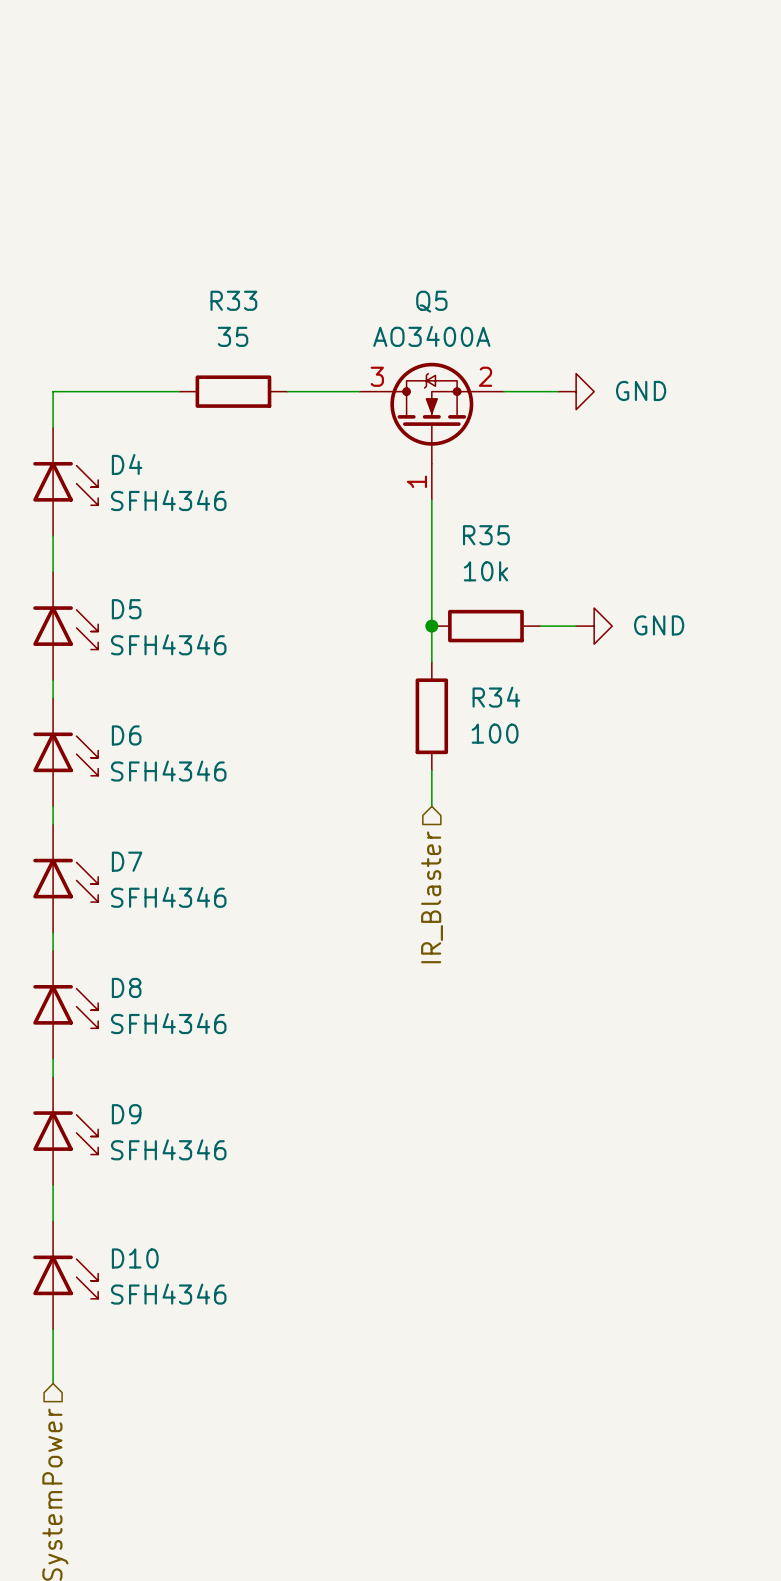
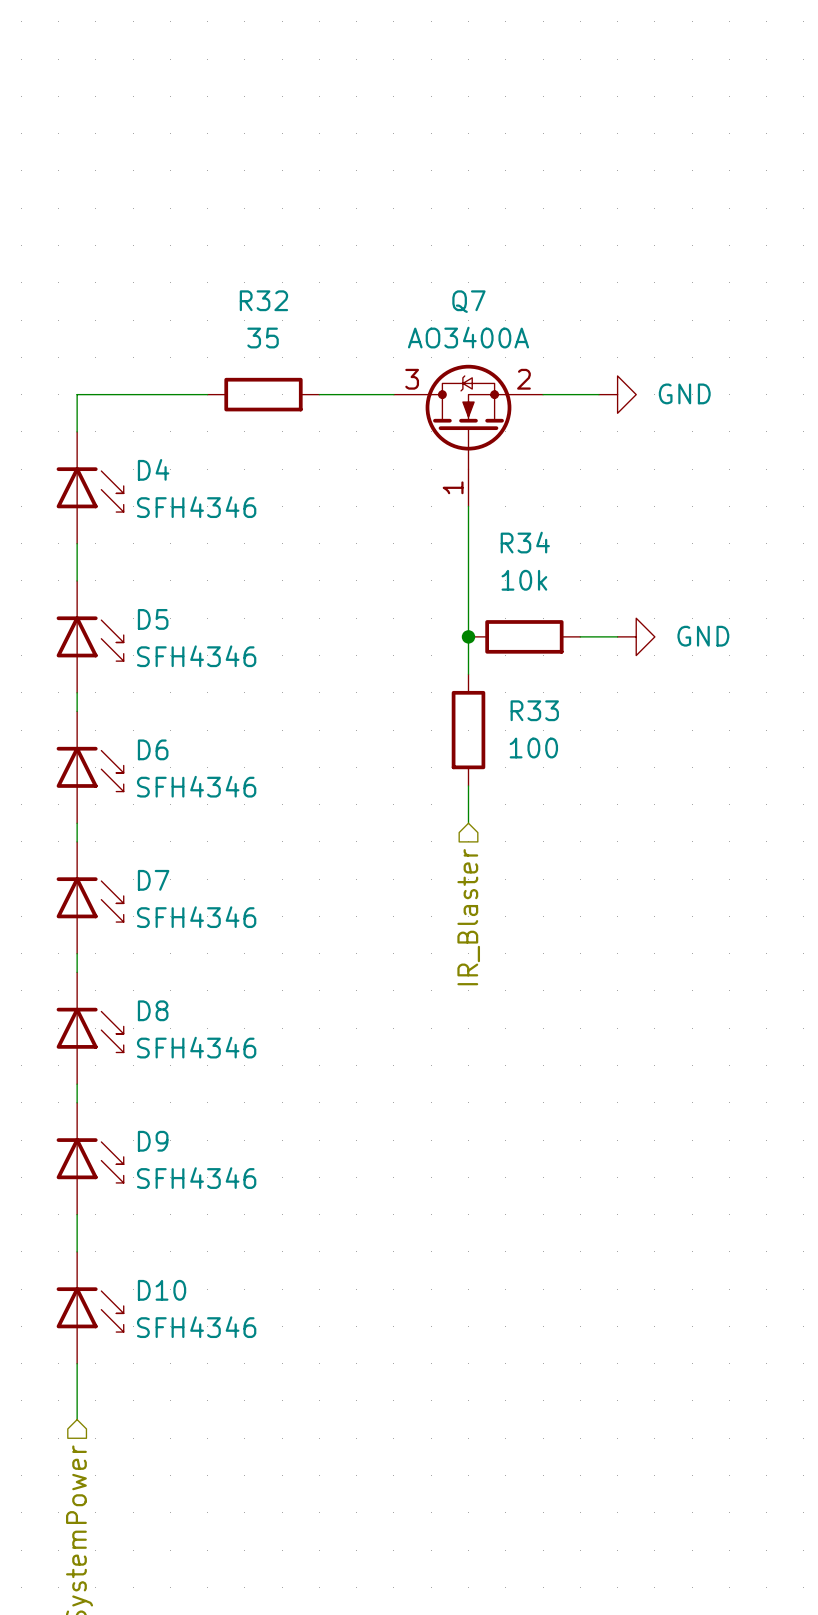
R33 name: R33 (233, 300) -> R32 (263, 300)
Q5 name: Q5 (431, 301) -> Q7 (468, 301)
R35 name: R35 (486, 535) -> R34 (525, 542)
R34 name: R34 (496, 697) -> R33 (534, 710)

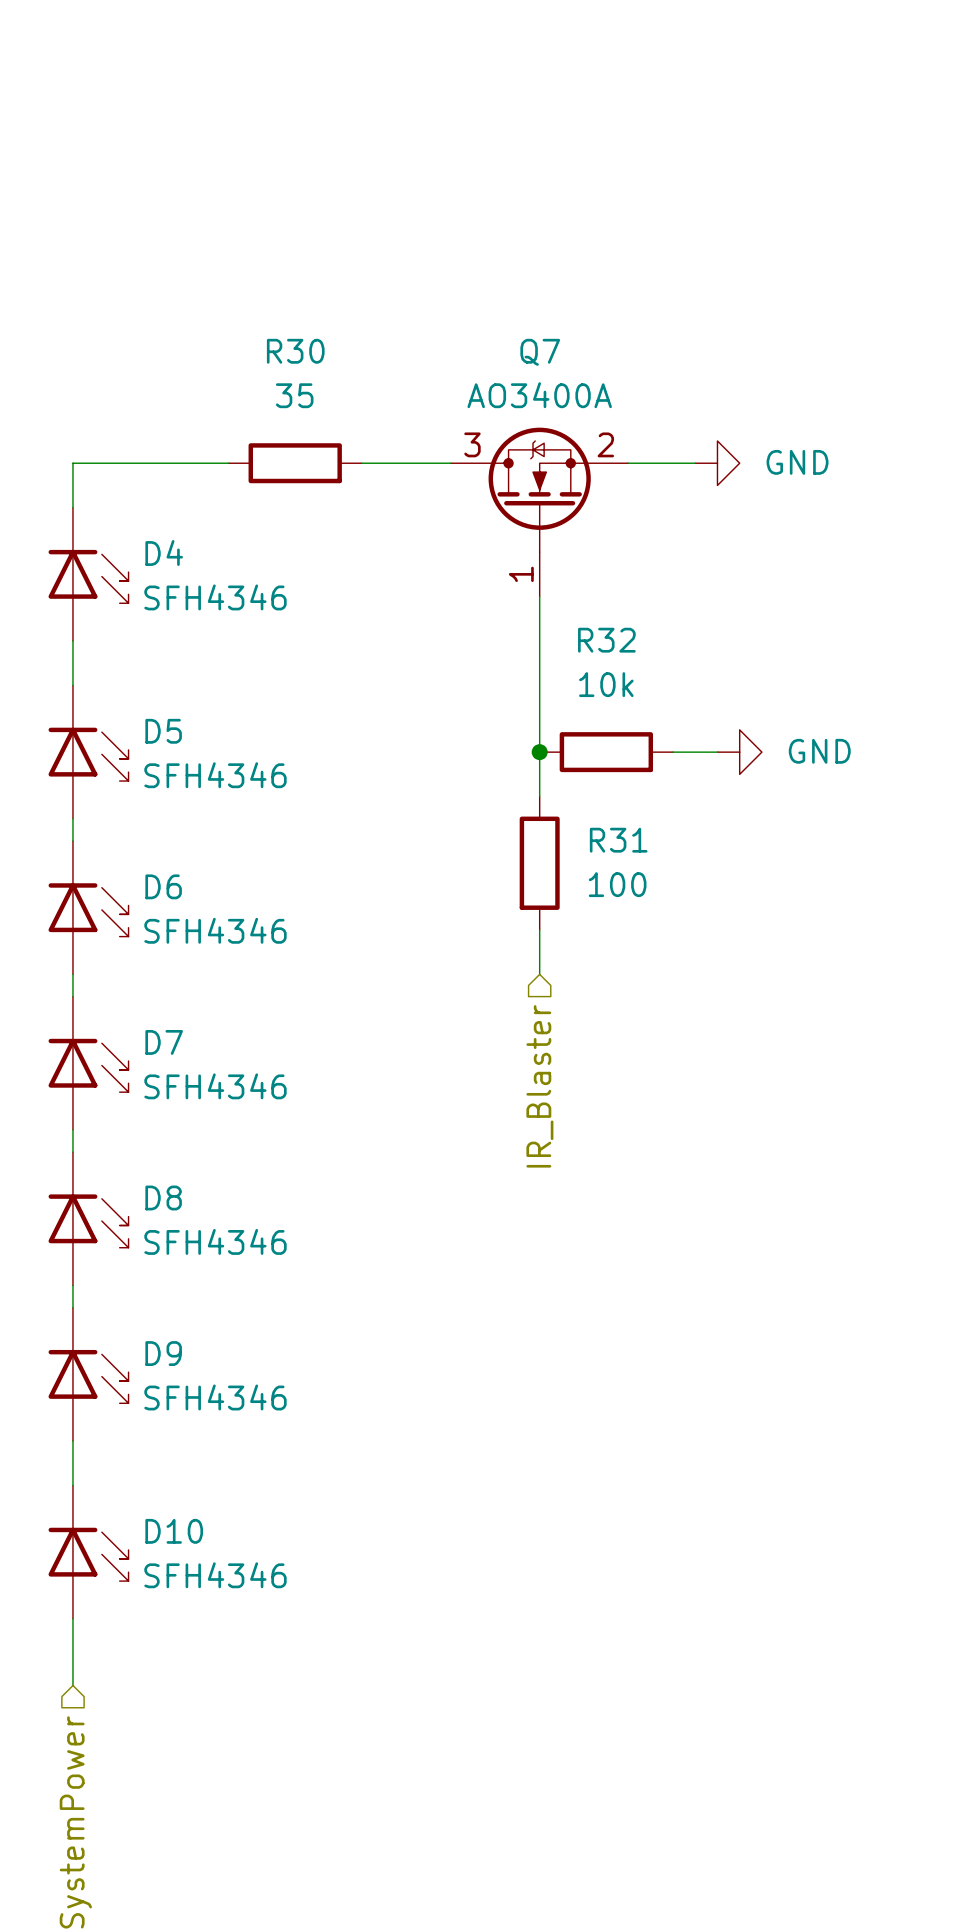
R32 name: R32 (263, 300) -> R30 (295, 351)
R34 name: R34 (525, 542) -> R32 (606, 640)
R33 name: R33 (534, 710) -> R31 (618, 840)

